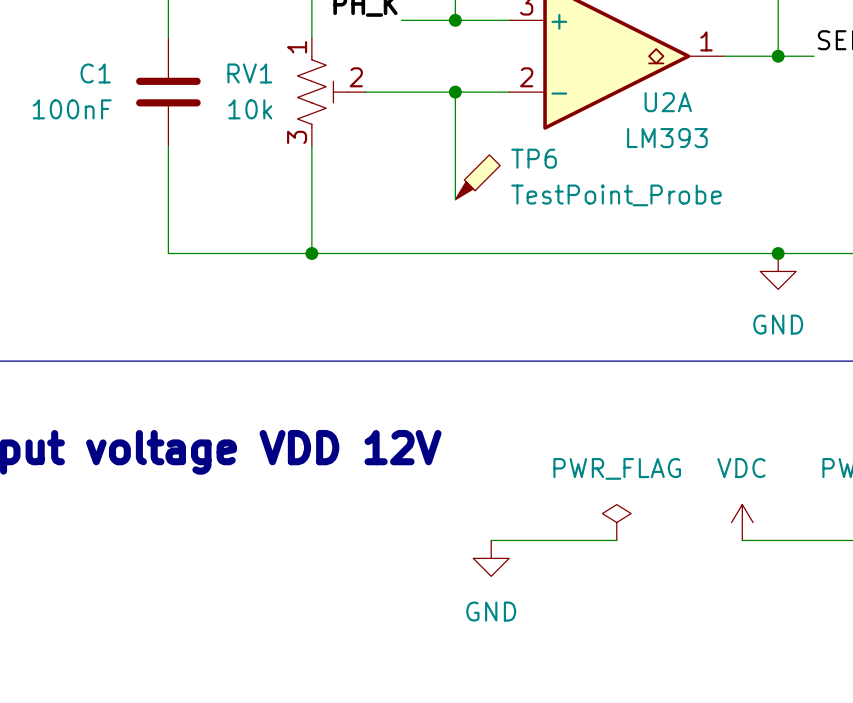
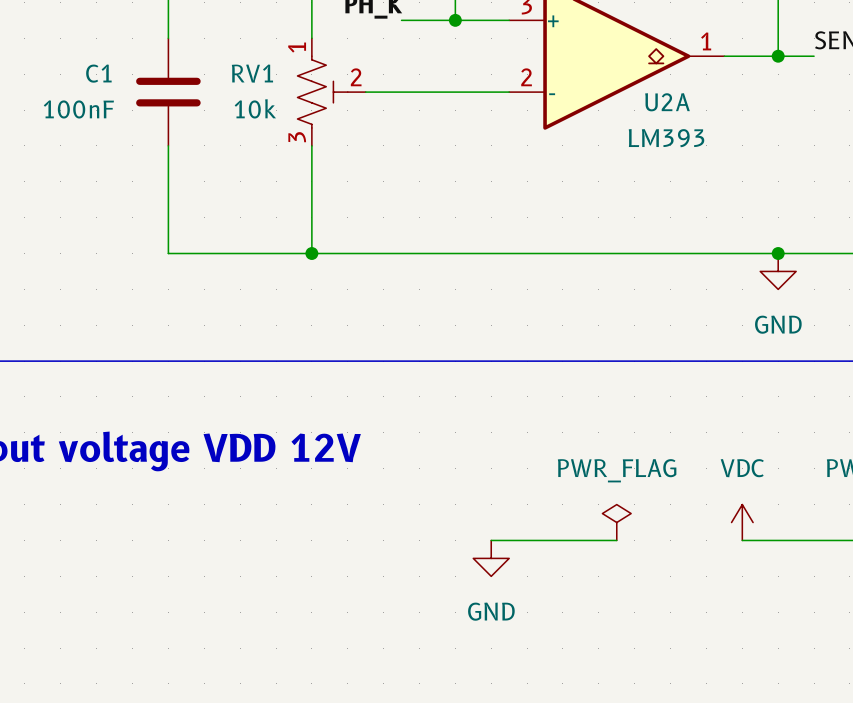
wire: (455, 92) (455, 199) -> none
junction: (455, 92) -> none
TP6: TestPoint_Probe (477, 177) -> none

